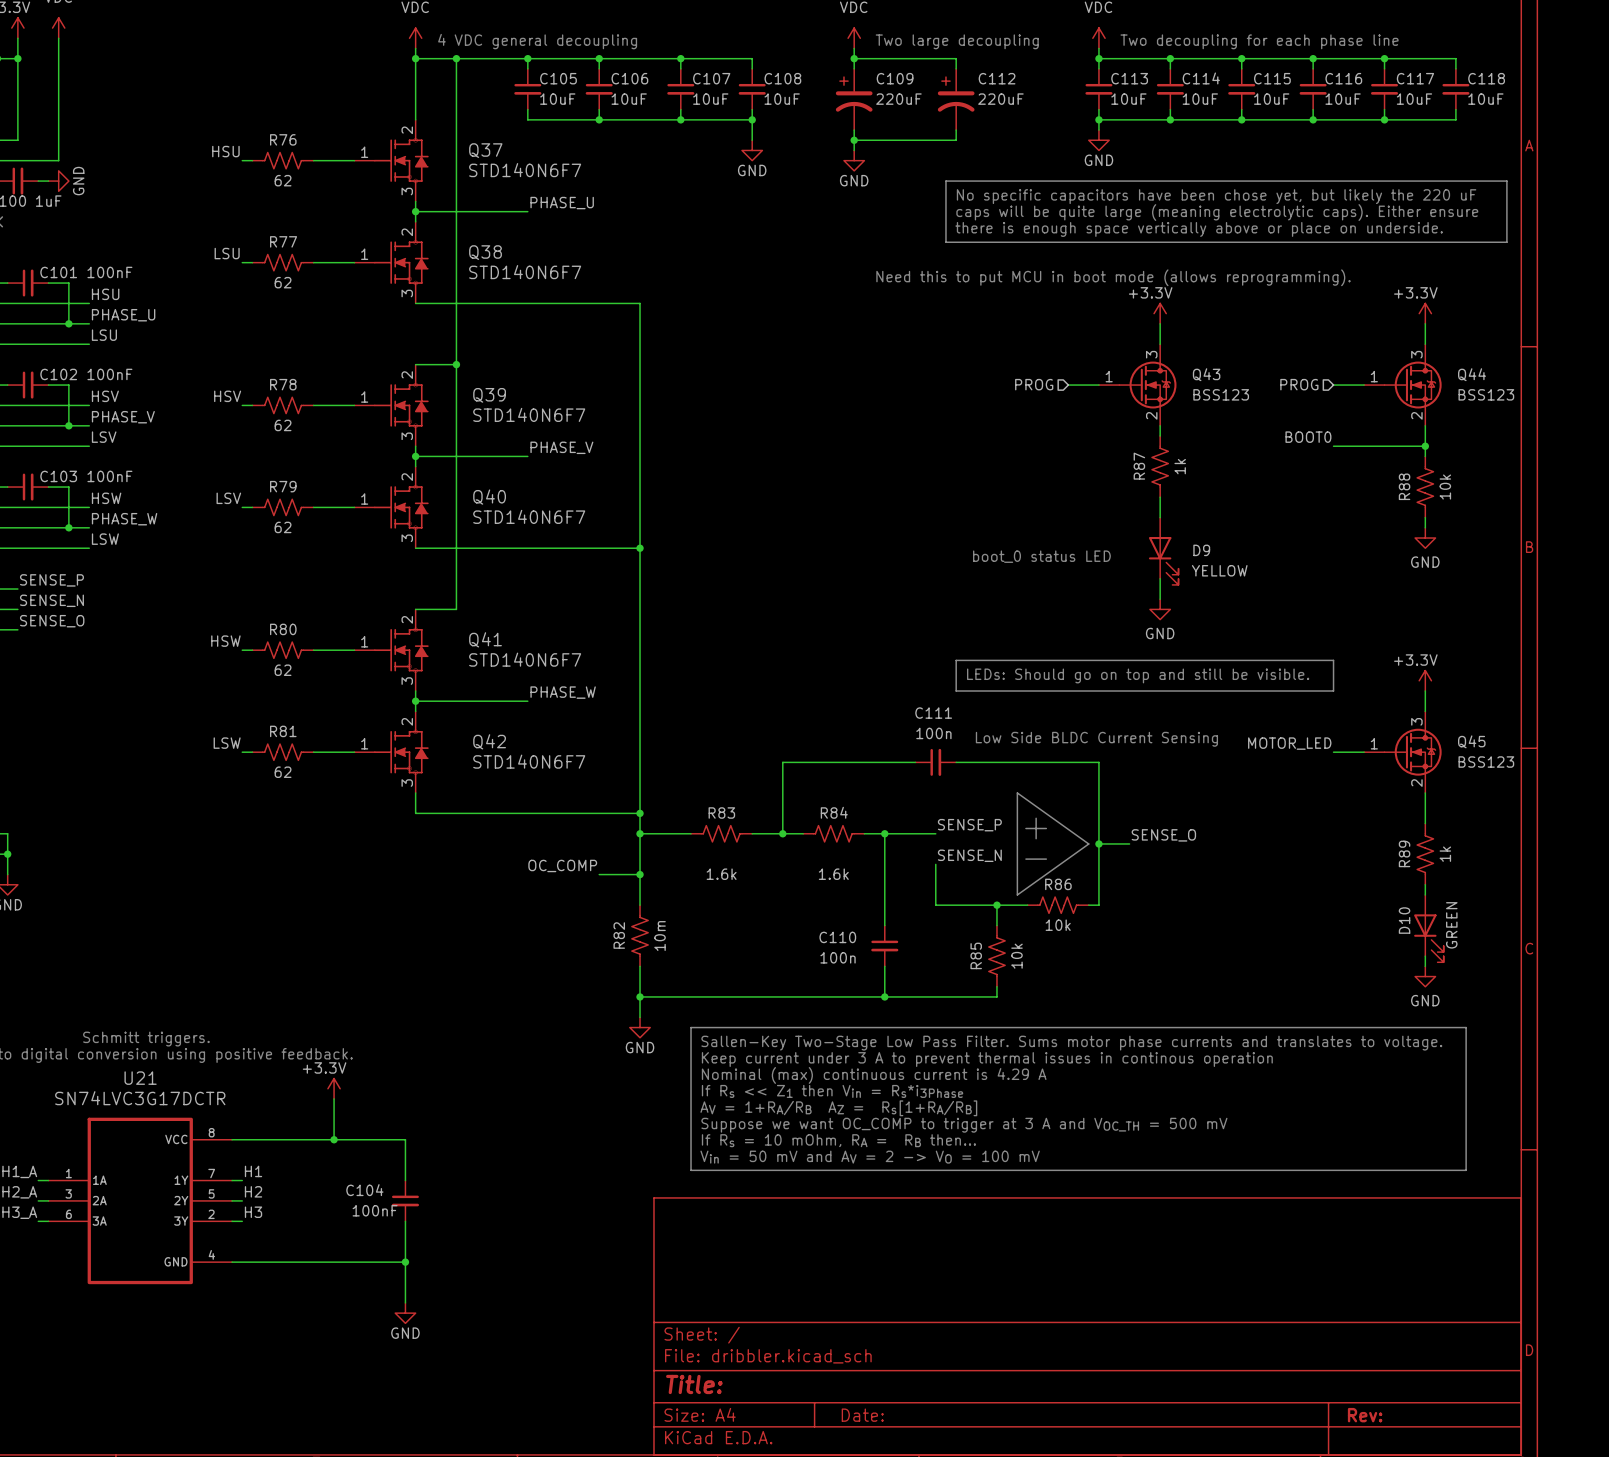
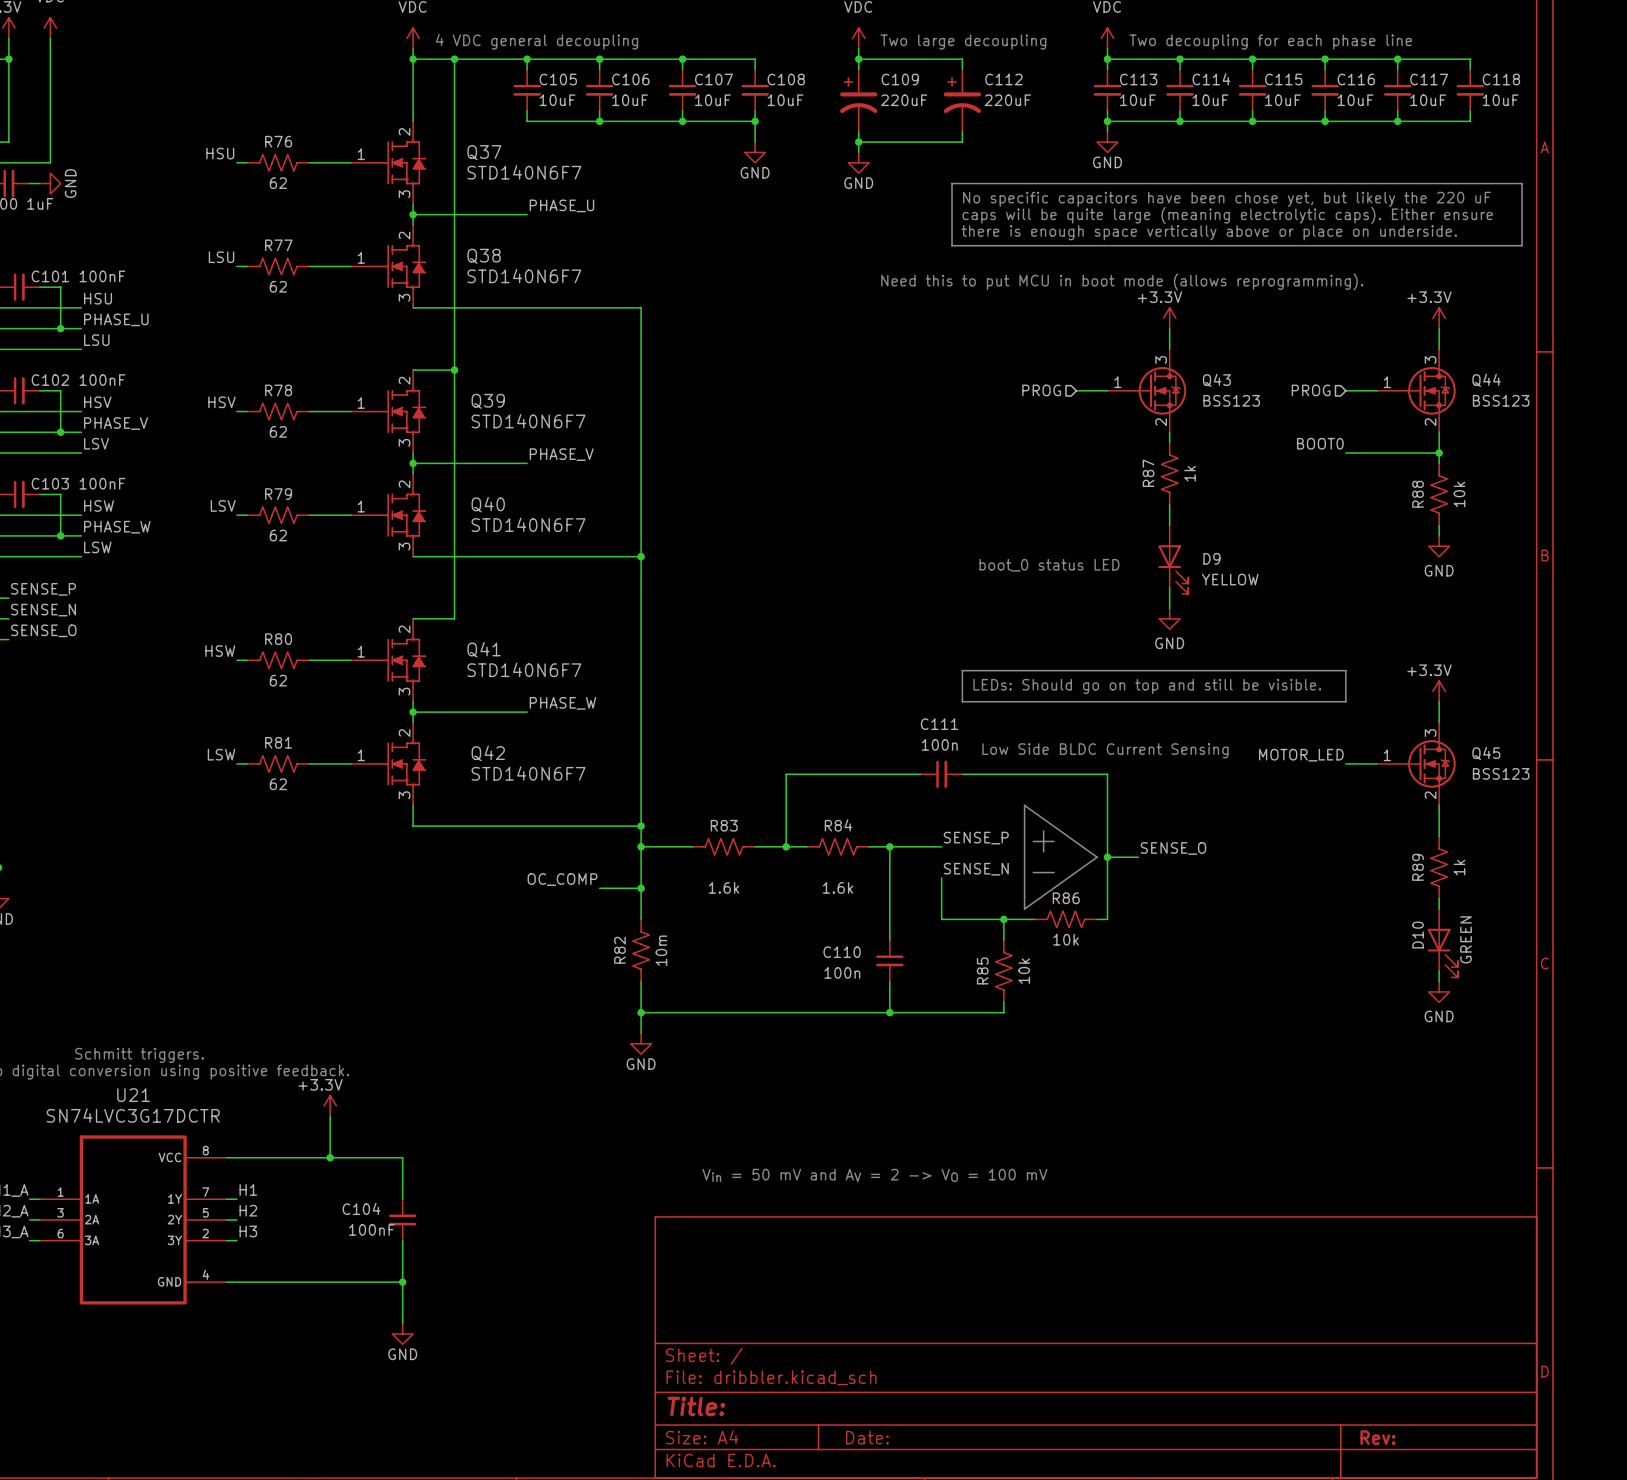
line: (691, 1027) (1466, 1027) (1466, 1170) (691, 1170) (691, 1027) -> none
text: Sallen-Key Two-Stage Low Pass Filter. Sums motor phase currents and translates to voltage. (1071, 1043) -> none
text: Keep current under 3 A to prevent thermal issues in continous operation (987, 1059) -> none
text: Nominal (max) continuous current is 4.29 A (874, 1075) -> none
text: If Rs << Z1 then Vin = Rs*i3Phase (832, 1091) -> none
text: AV = 1+RA/RB AZ = Rs[1+RA/RB] (838, 1108) -> none
text: Suppose we want OC_COMP to trigger at 3 A and VOC_TH = 500 mV (964, 1125) -> none
text: If Rs = 10 mOhm, RA = RB then... (838, 1140) -> none

